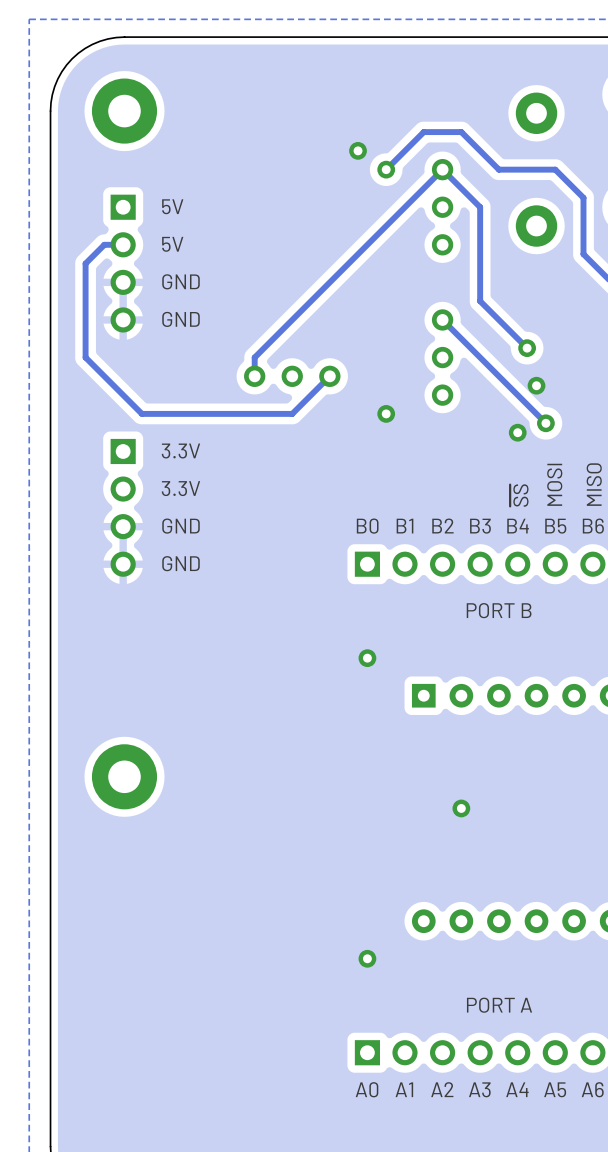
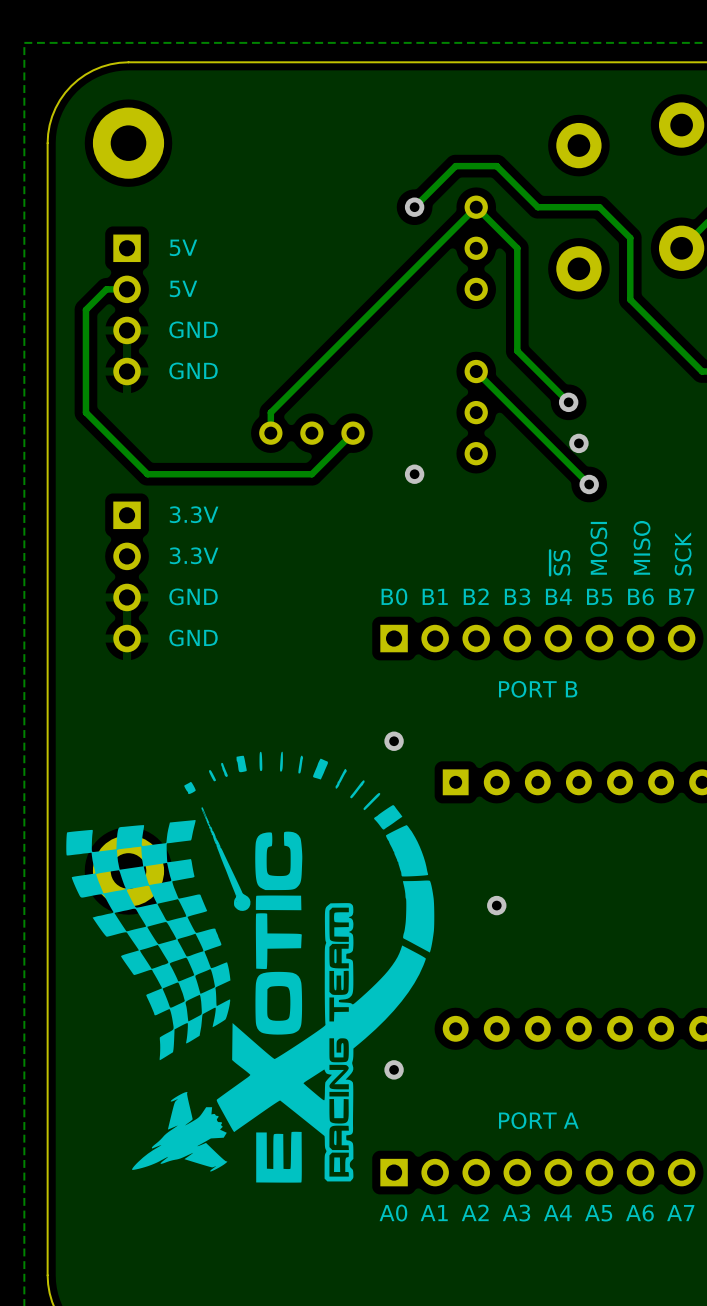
via: (358, 150) -> none
via: (517, 432) -> none
drawing: none -> [66, 751, 435, 1183]

